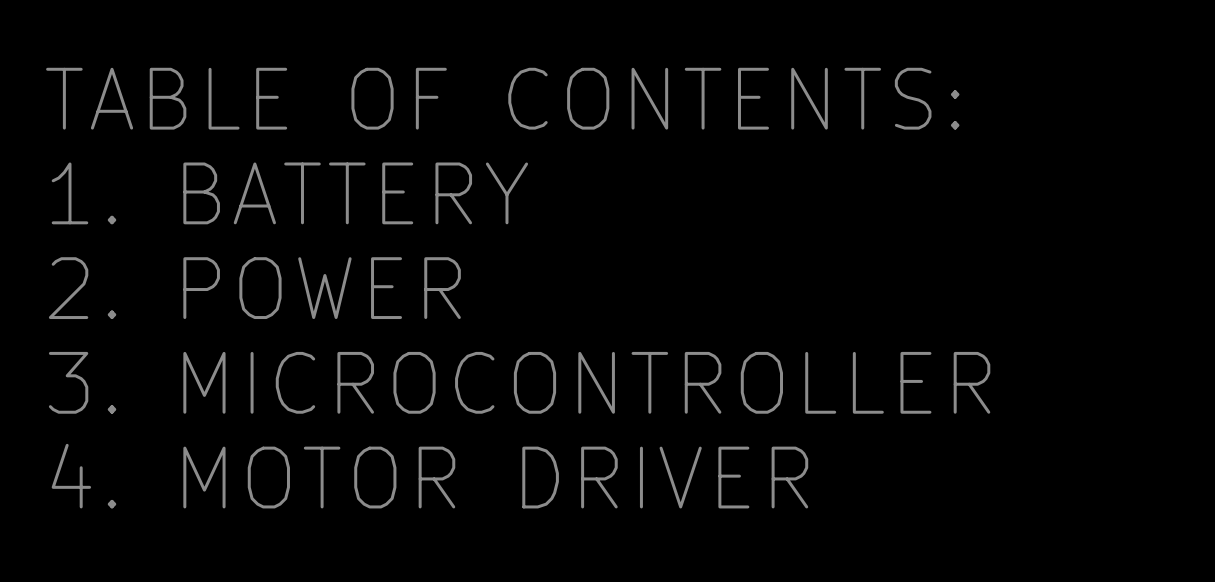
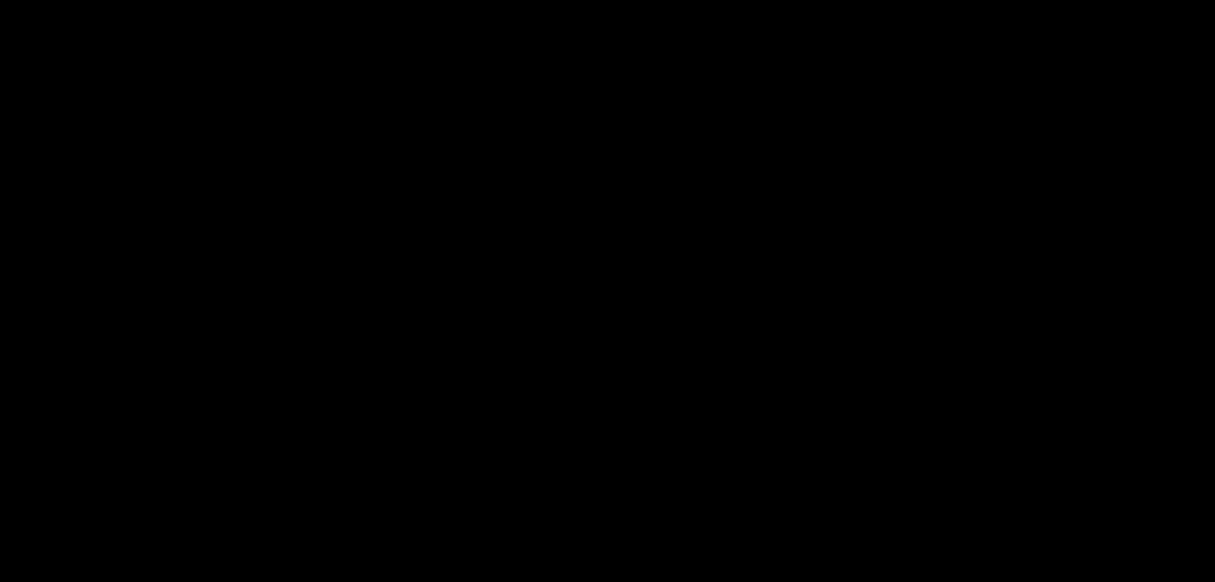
text: TABLE OF CONTENTS: (502, 98) -> none
text: 1. BATTERY (289, 193) -> none
text: 2. POWER (254, 288) -> none
text: 3. MICROCONTROLLER (519, 382) -> none
text: 4. MOTOR DRIVER (429, 476) -> none

